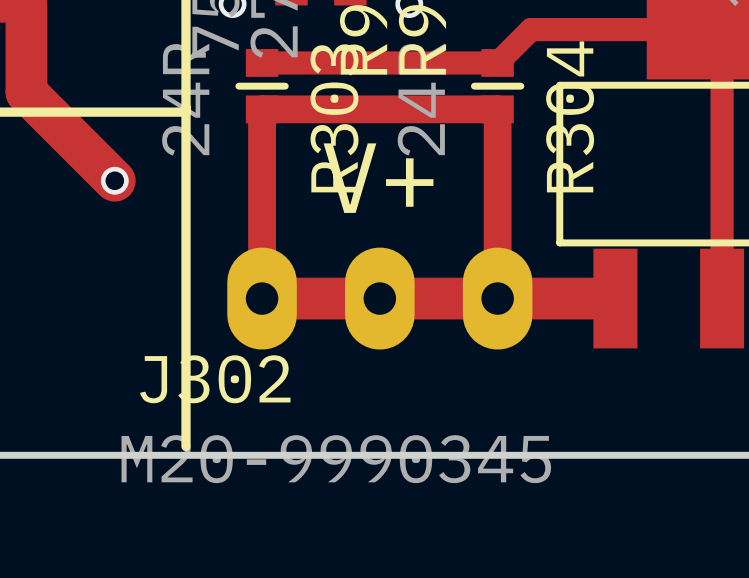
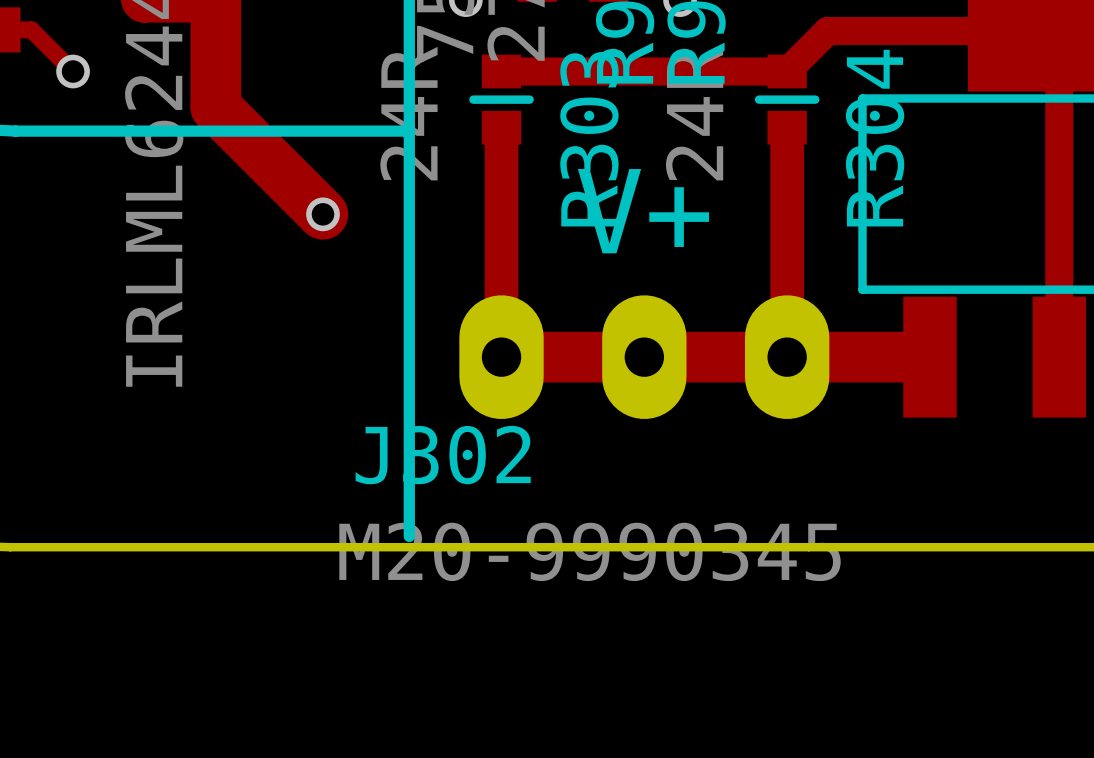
track: (262, 109) (497, 109) -> none

